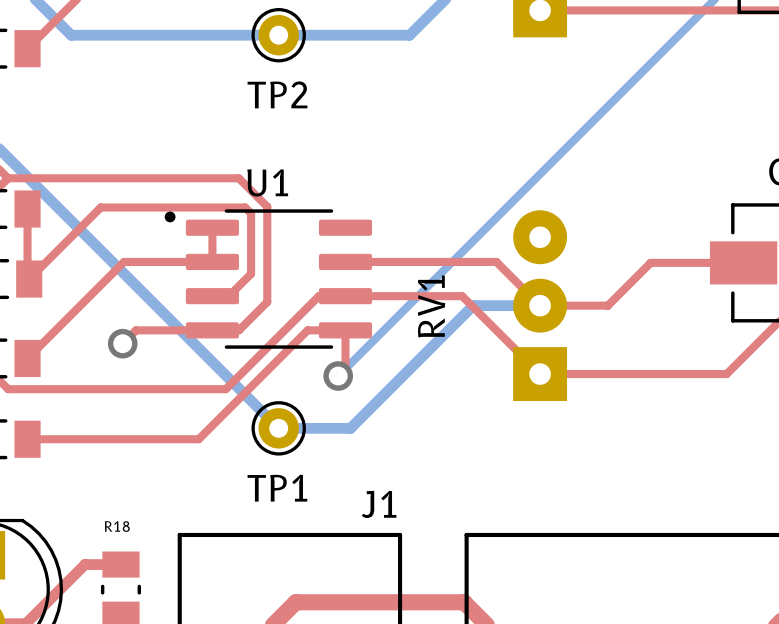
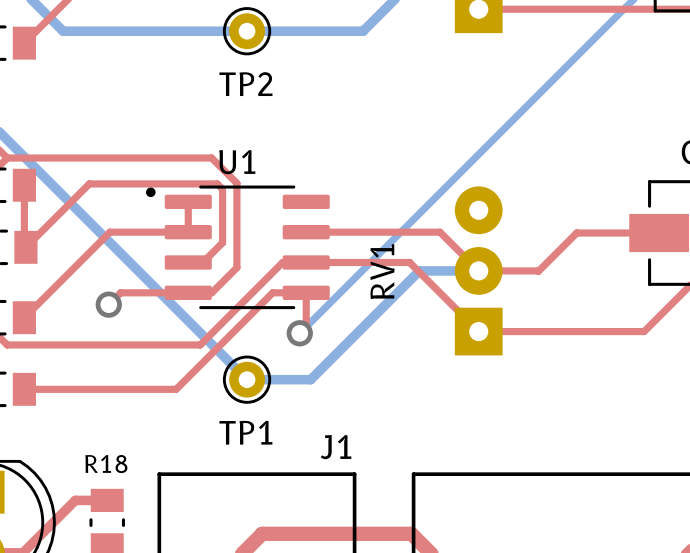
text: none -> R18 (106, 464)
R18 name: R18 (117, 526) -> none

